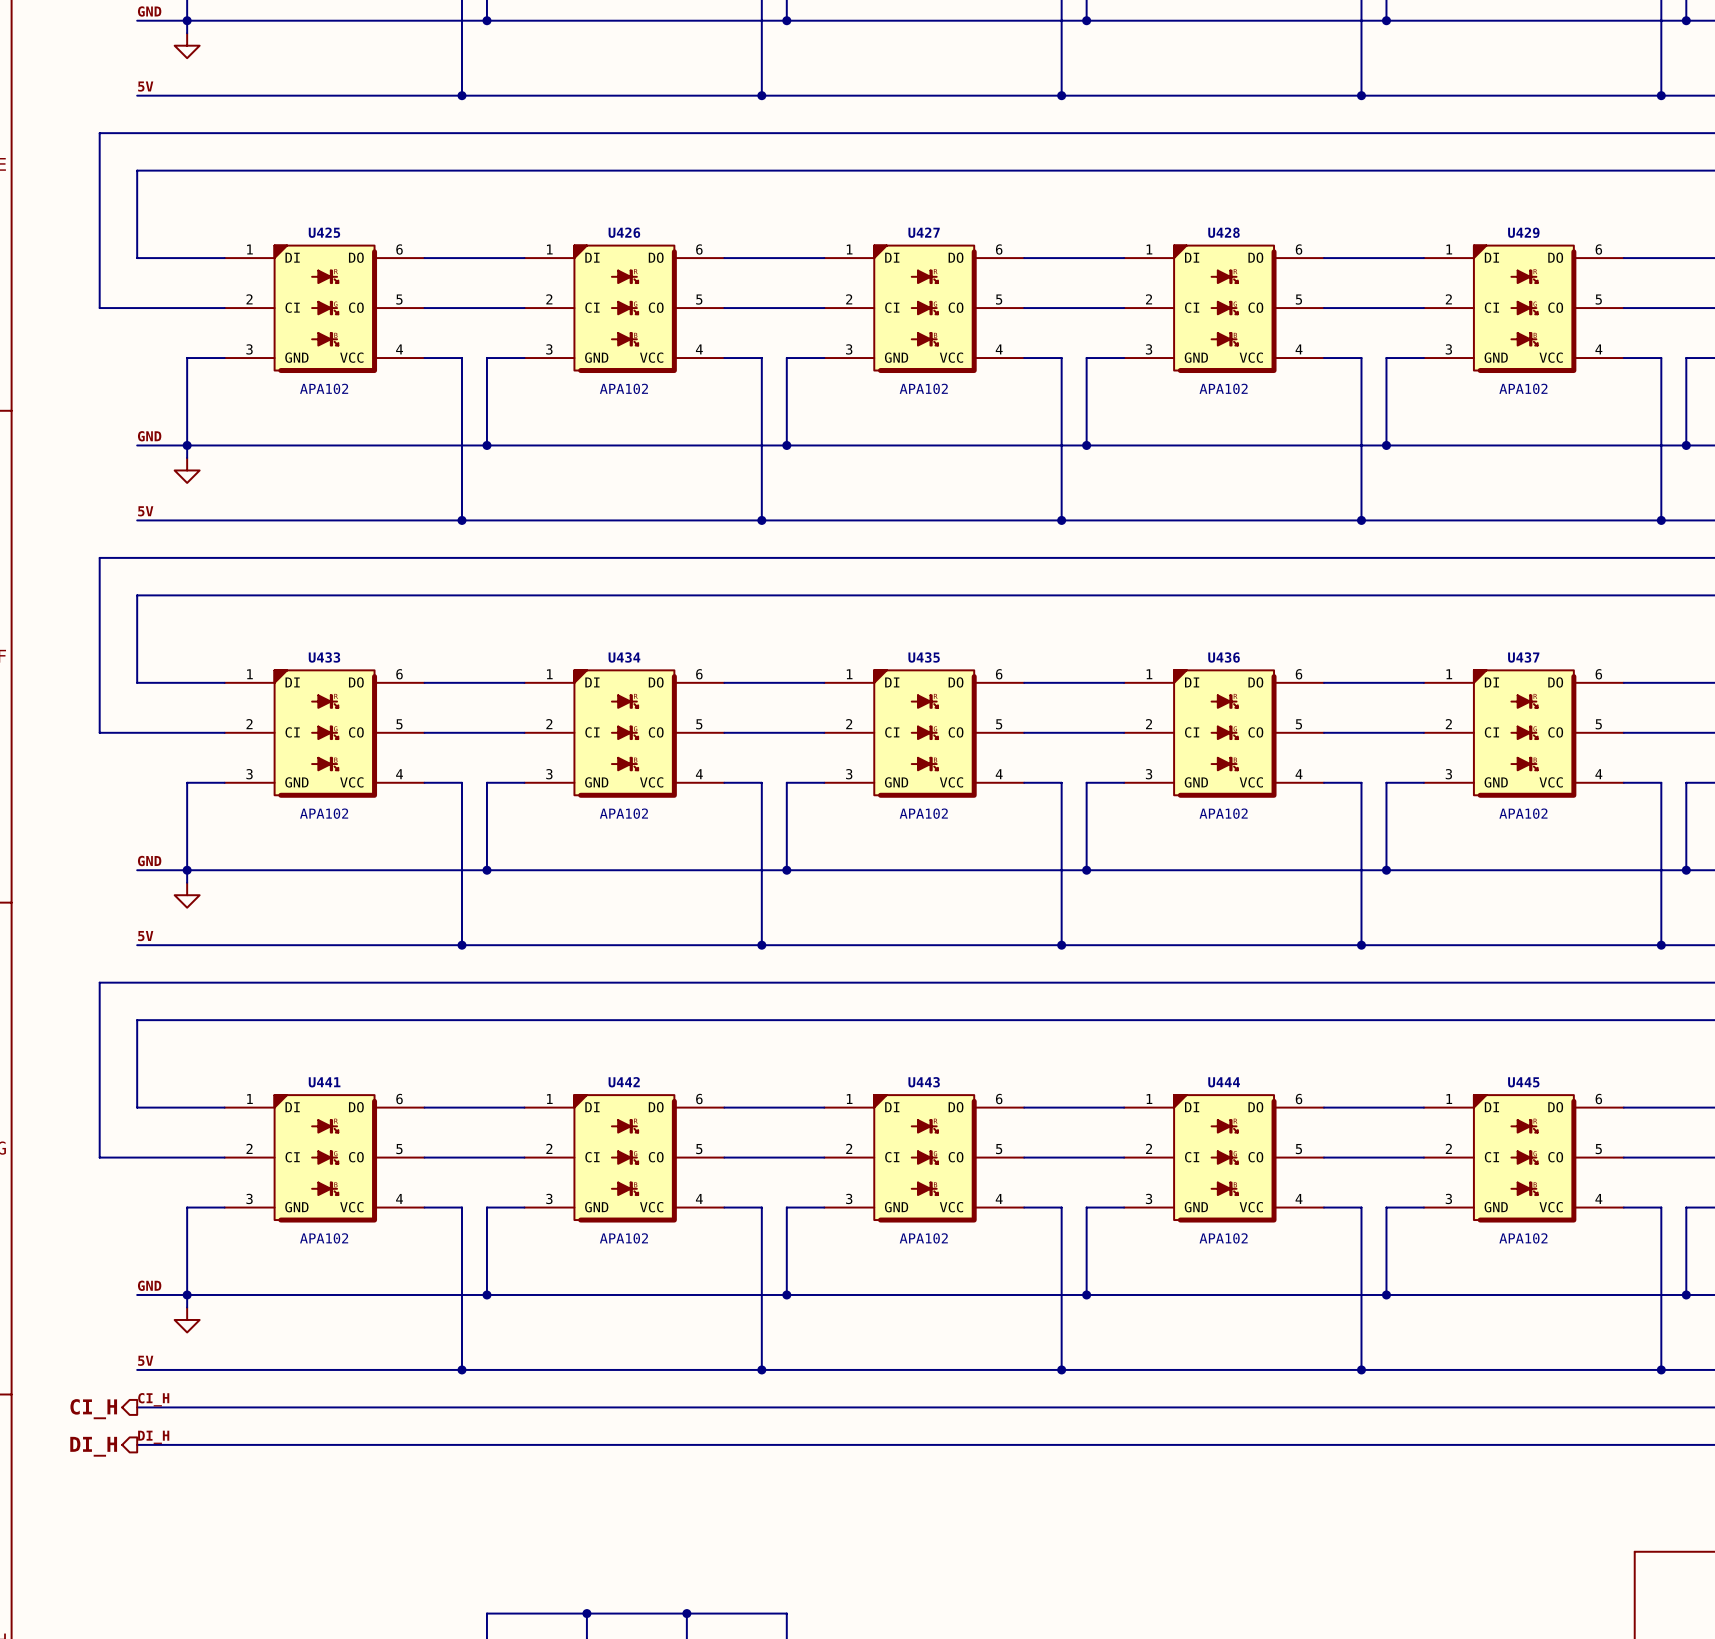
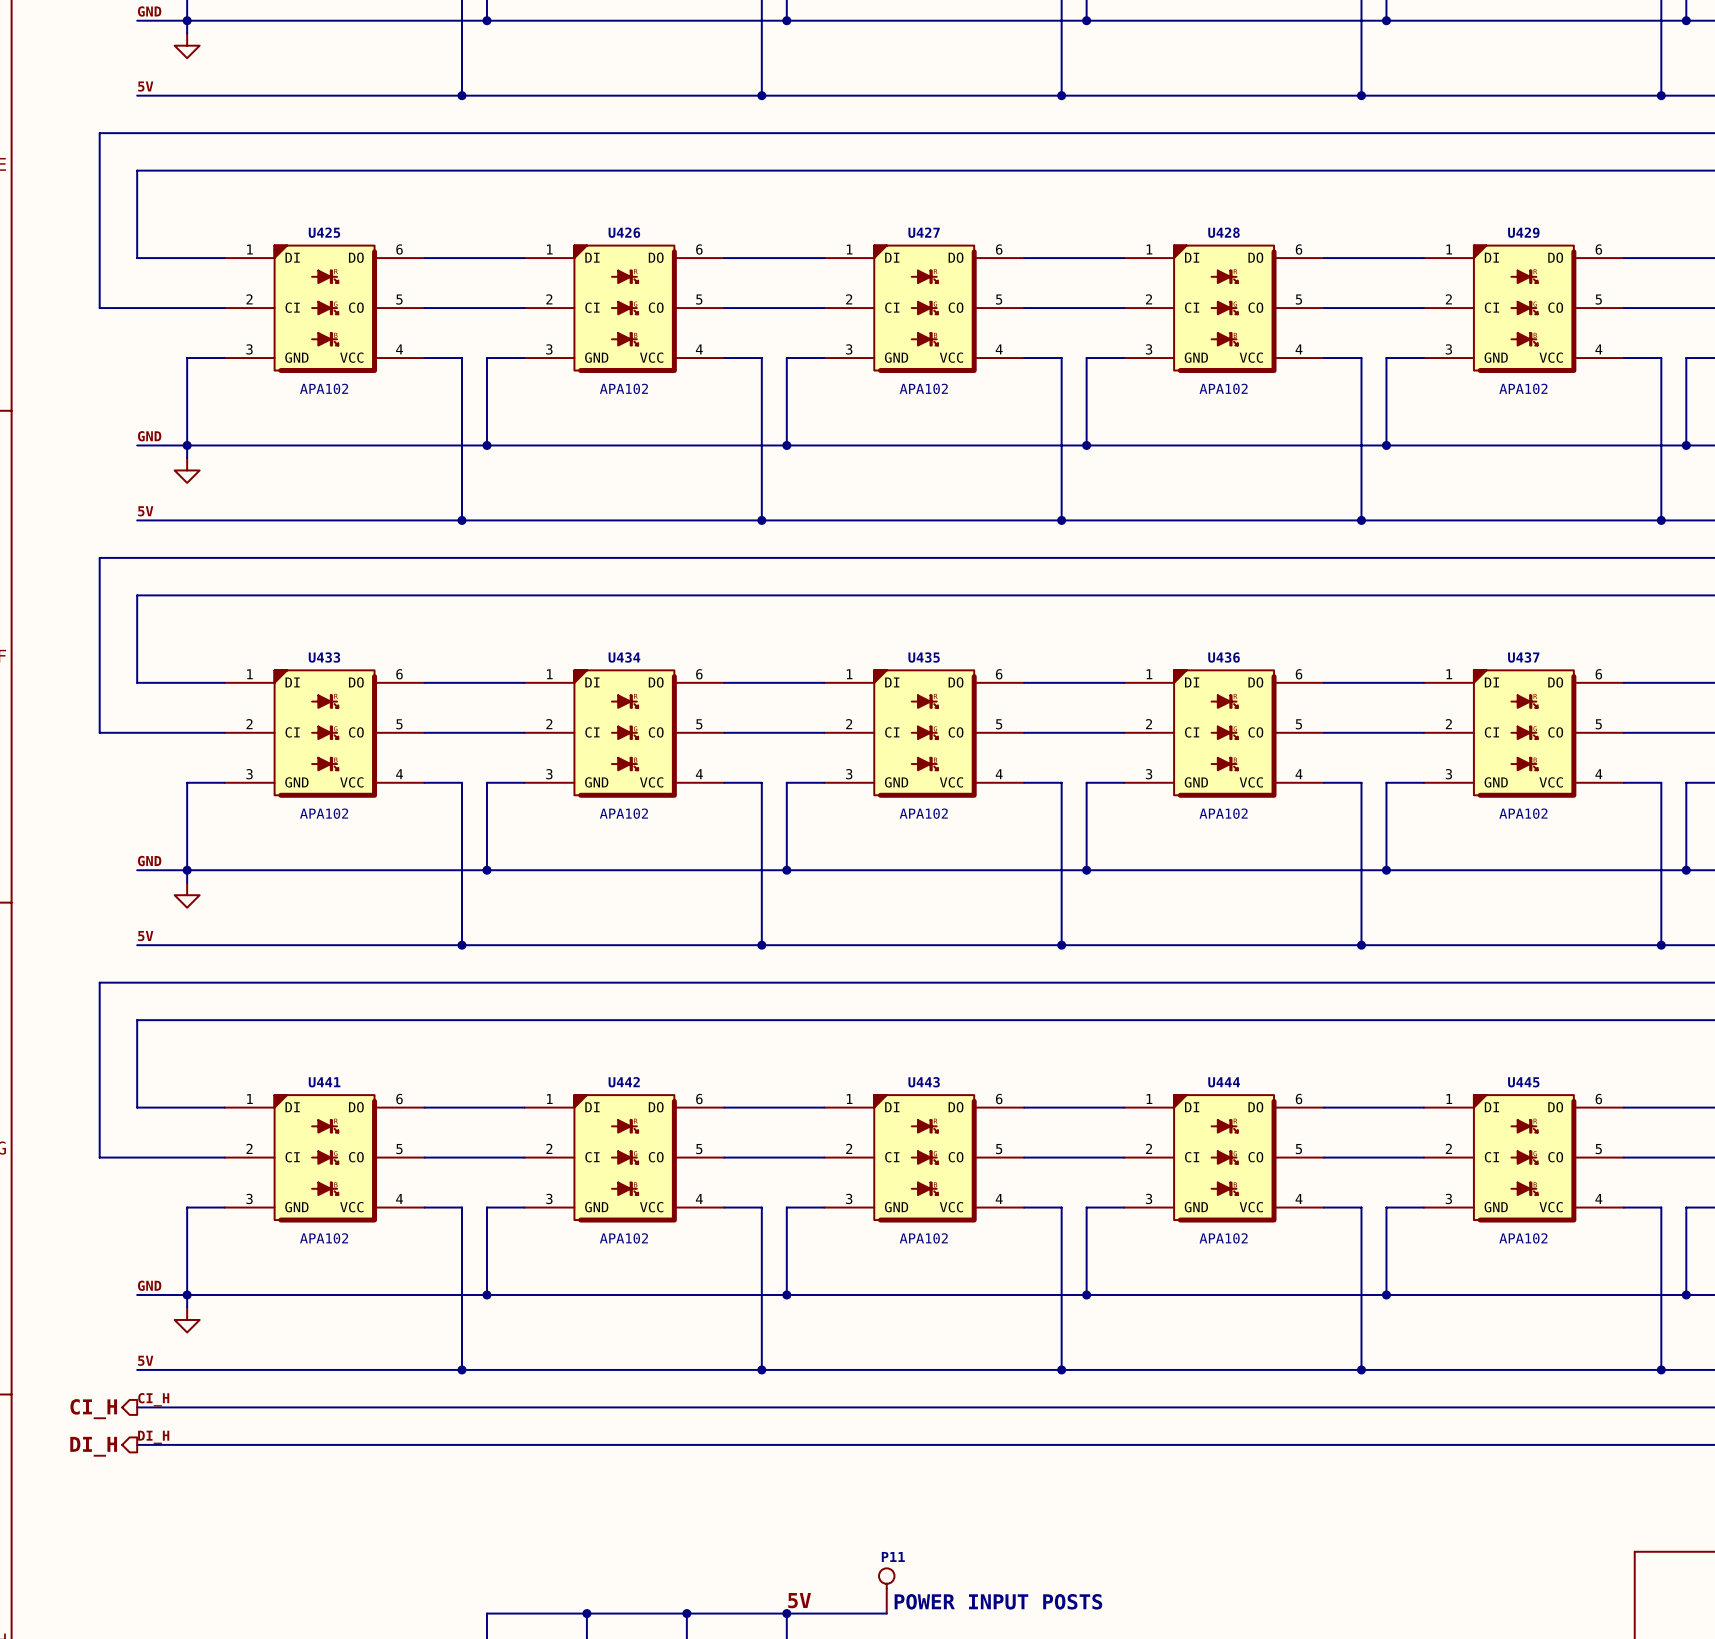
P11: none -> (886, 1590)
label: none -> 5V (799, 1600)
text: none -> POWER INPUT POSTS (998, 1601)
wire: none -> (786, 1613) (886, 1613)
junction: none -> (786, 1613)

